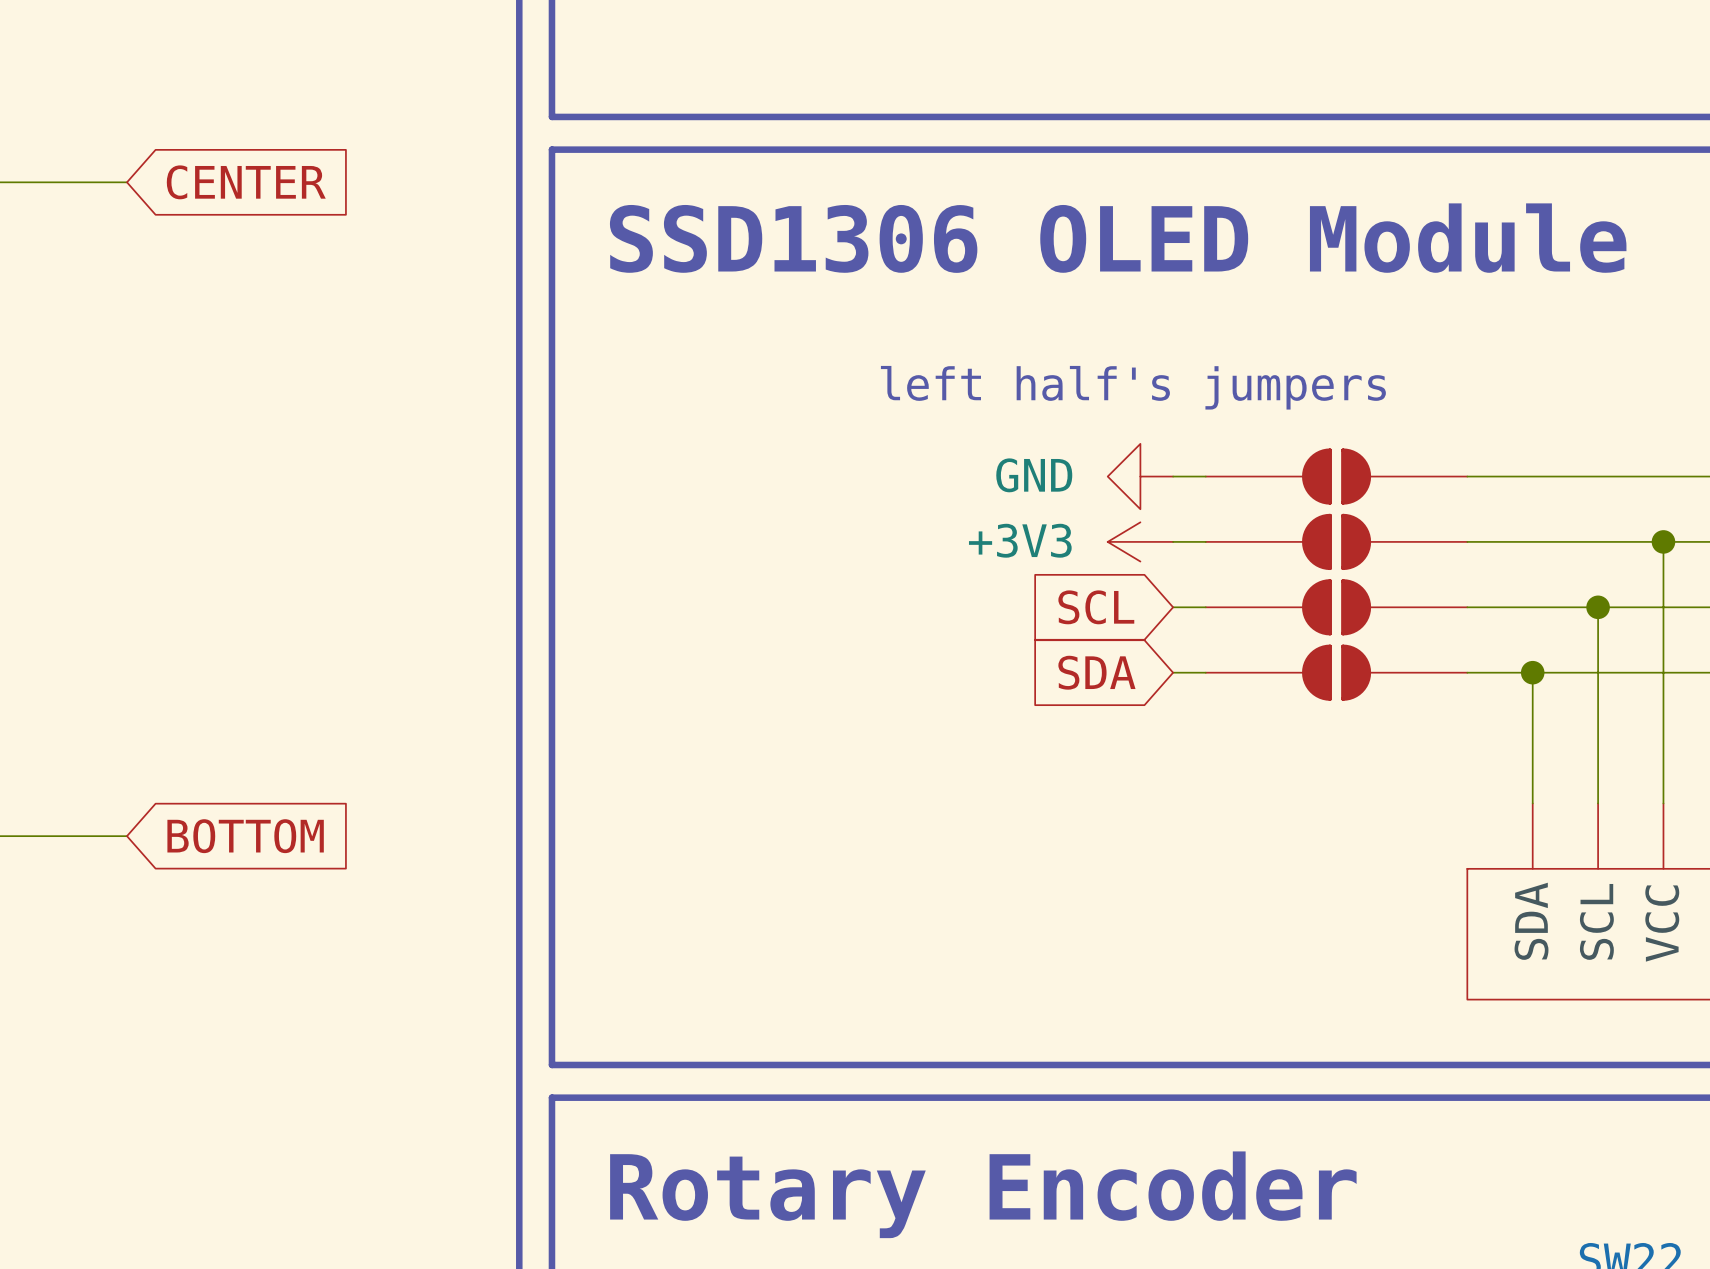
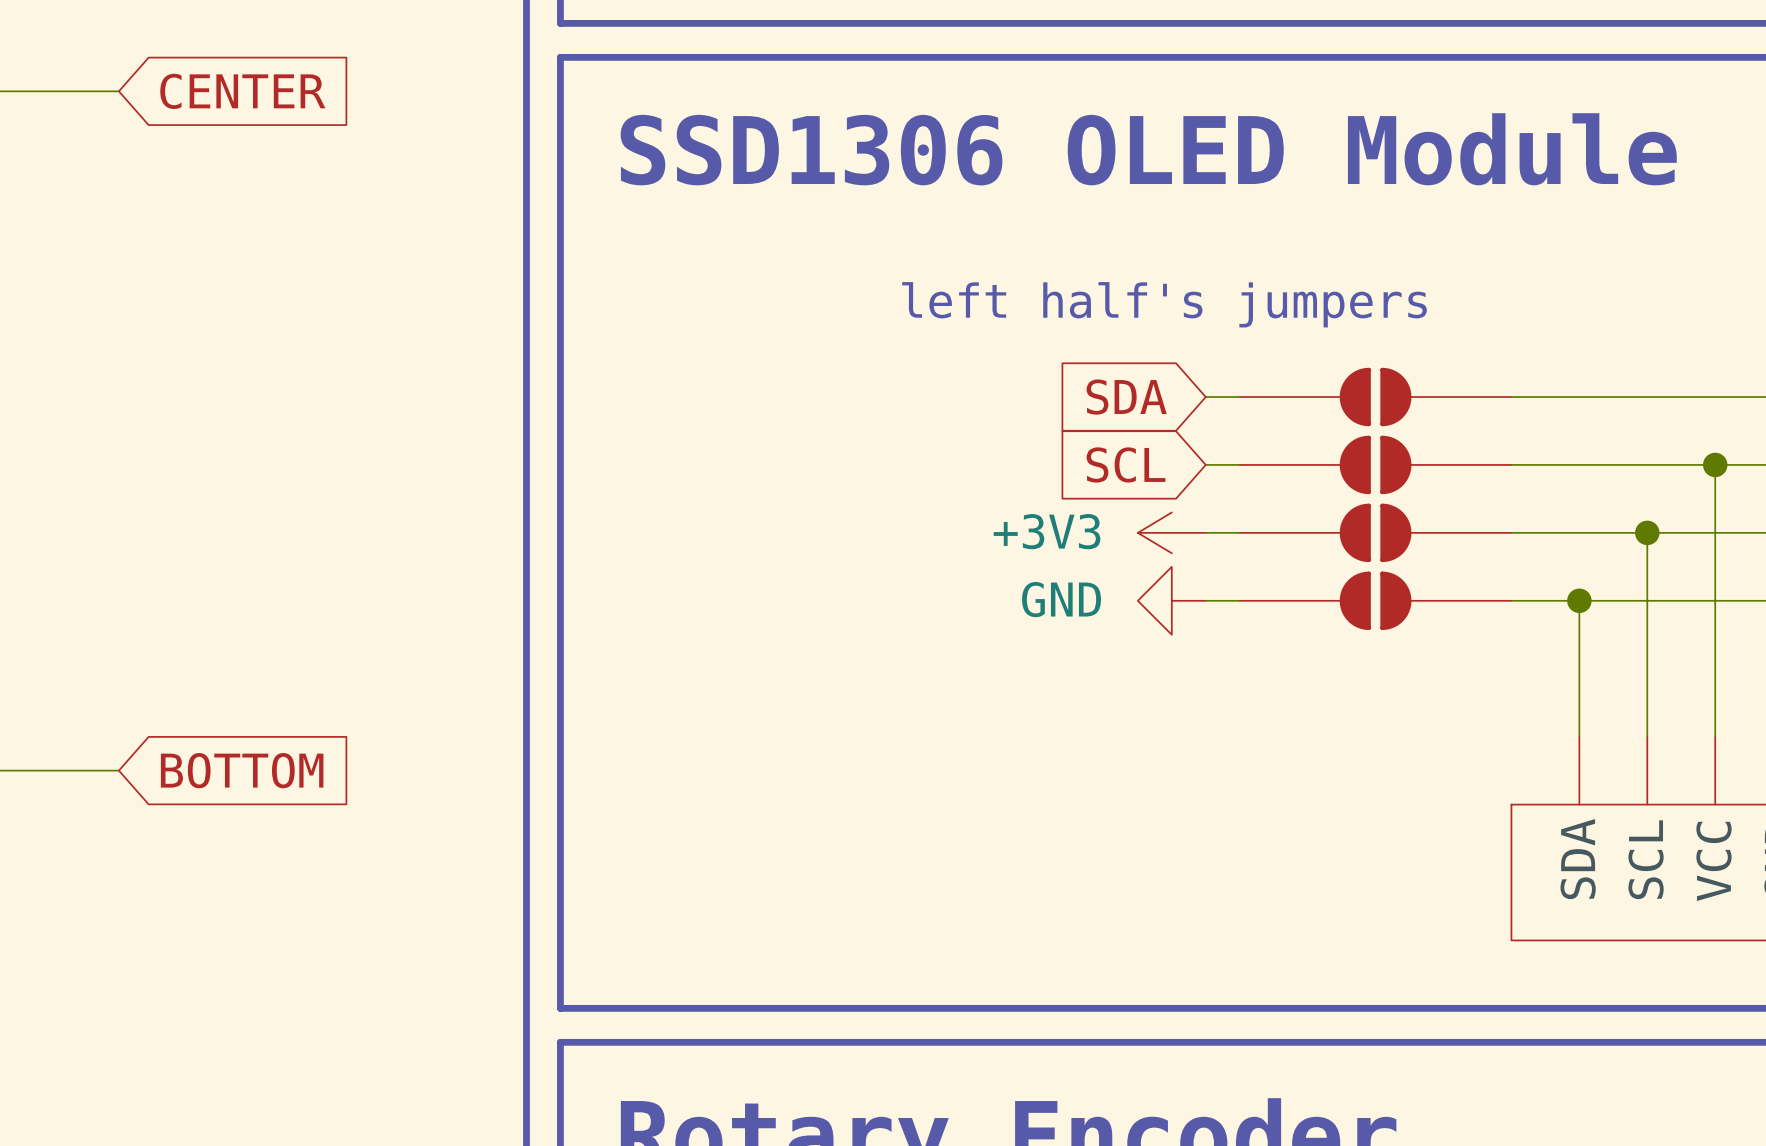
power symbol position: GND (1140, 476) -> GND (1171, 600)
power symbol position: +3V3 (1140, 541) -> +3V3 (1171, 532)
global label position: SCL (1096, 607) -> SCL (1125, 464)
global label position: SDA (1096, 672) -> SDA (1126, 397)

